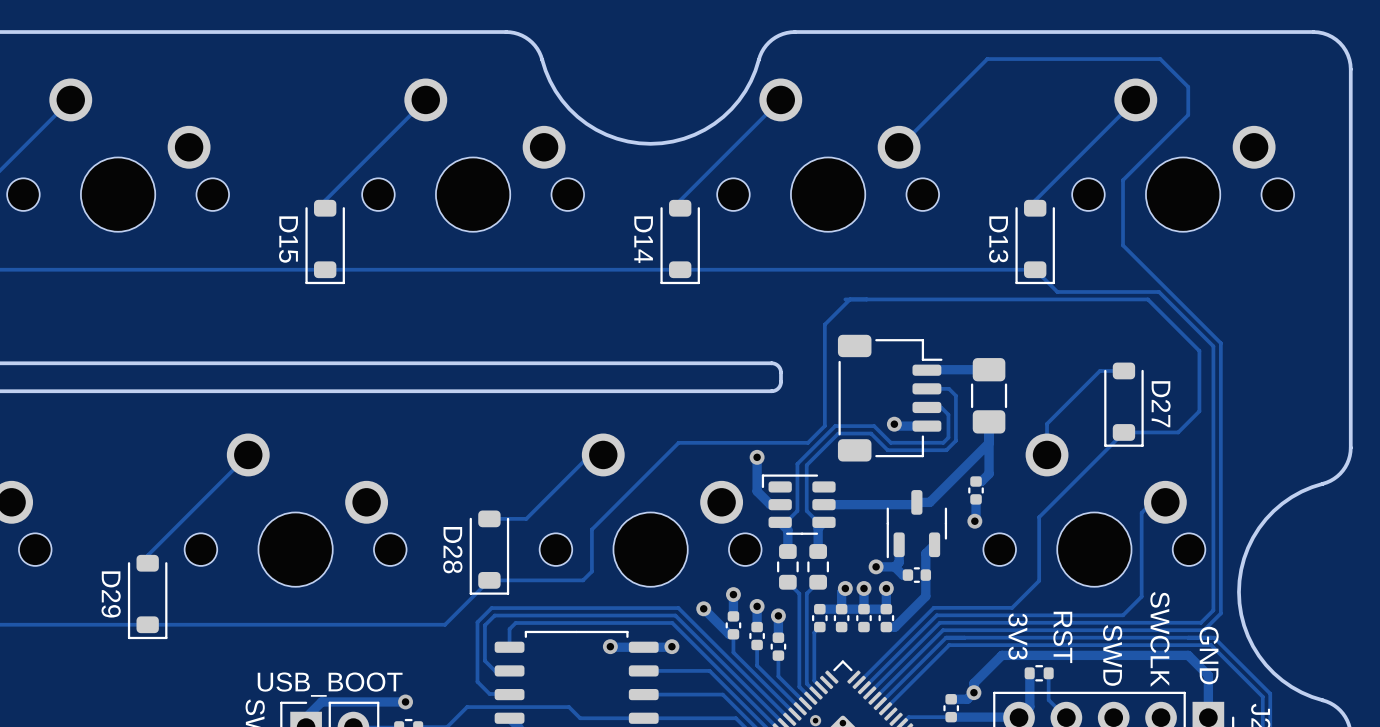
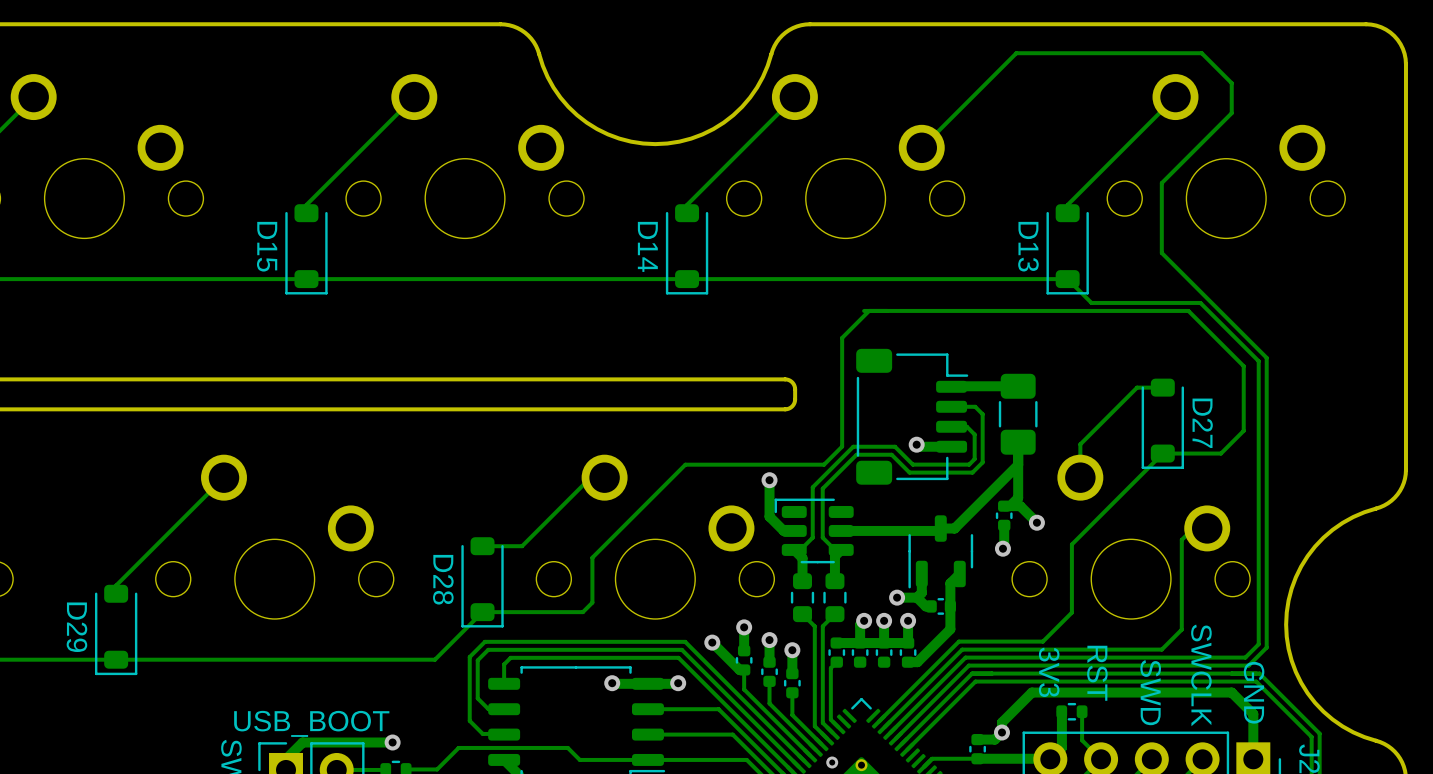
track: none -> (1010, 506) (1020, 506) (1036, 522)
via: none -> (1036, 522)

